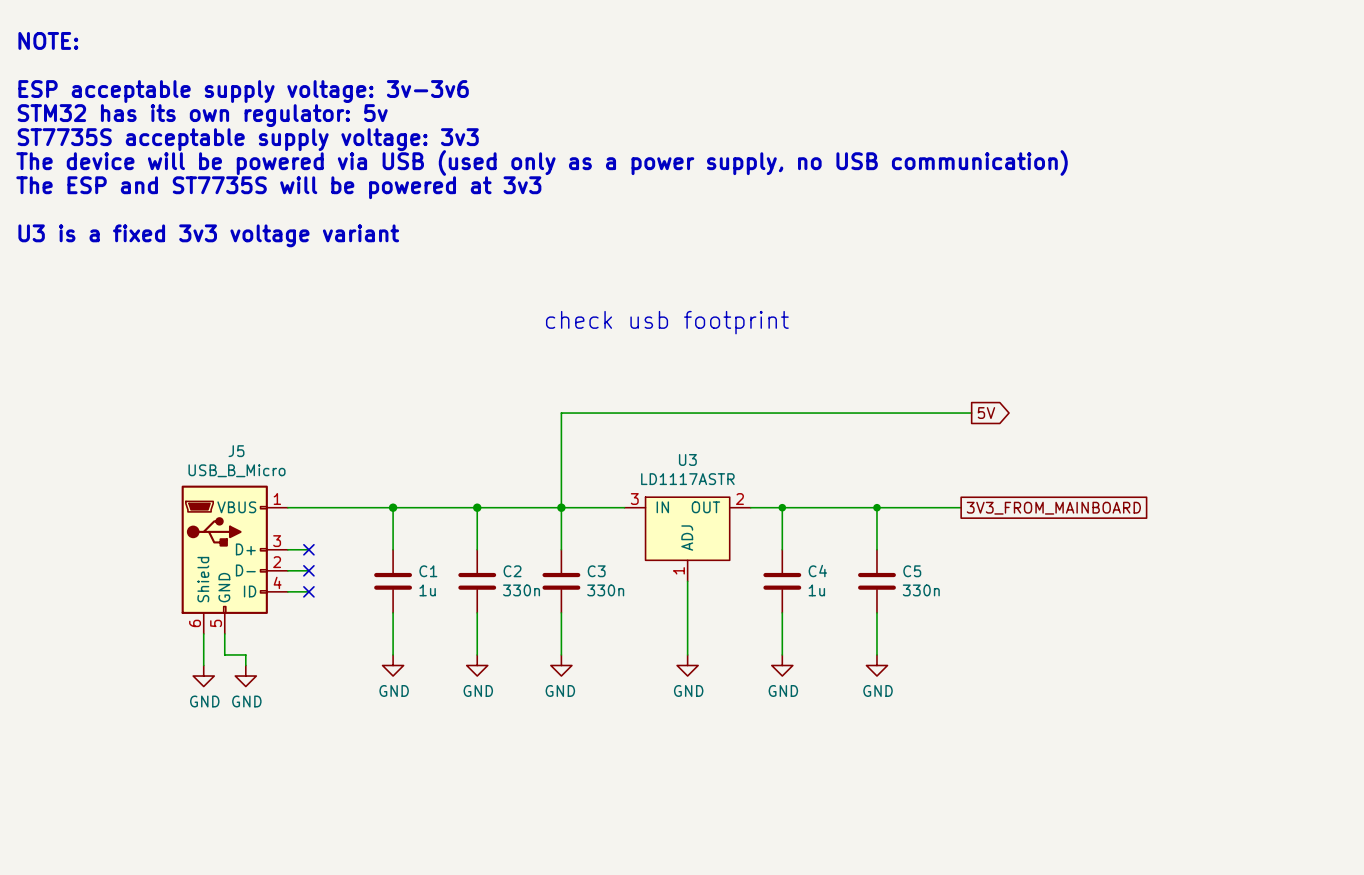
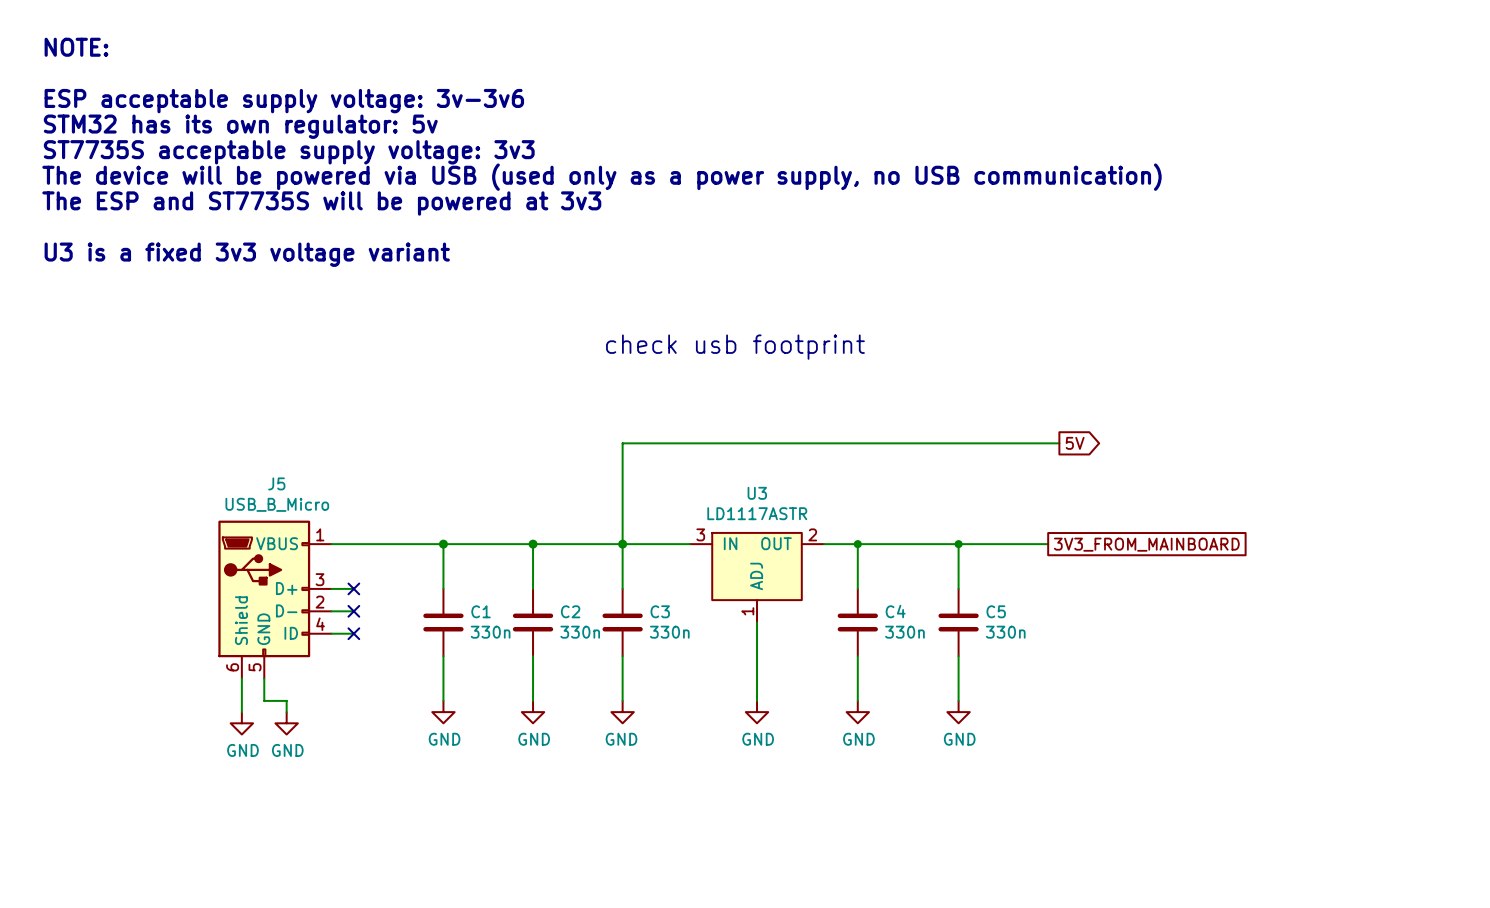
C1 value: 1u (427, 590) -> 330n (490, 632)
C4 value: 1u (816, 590) -> 330n (904, 632)

